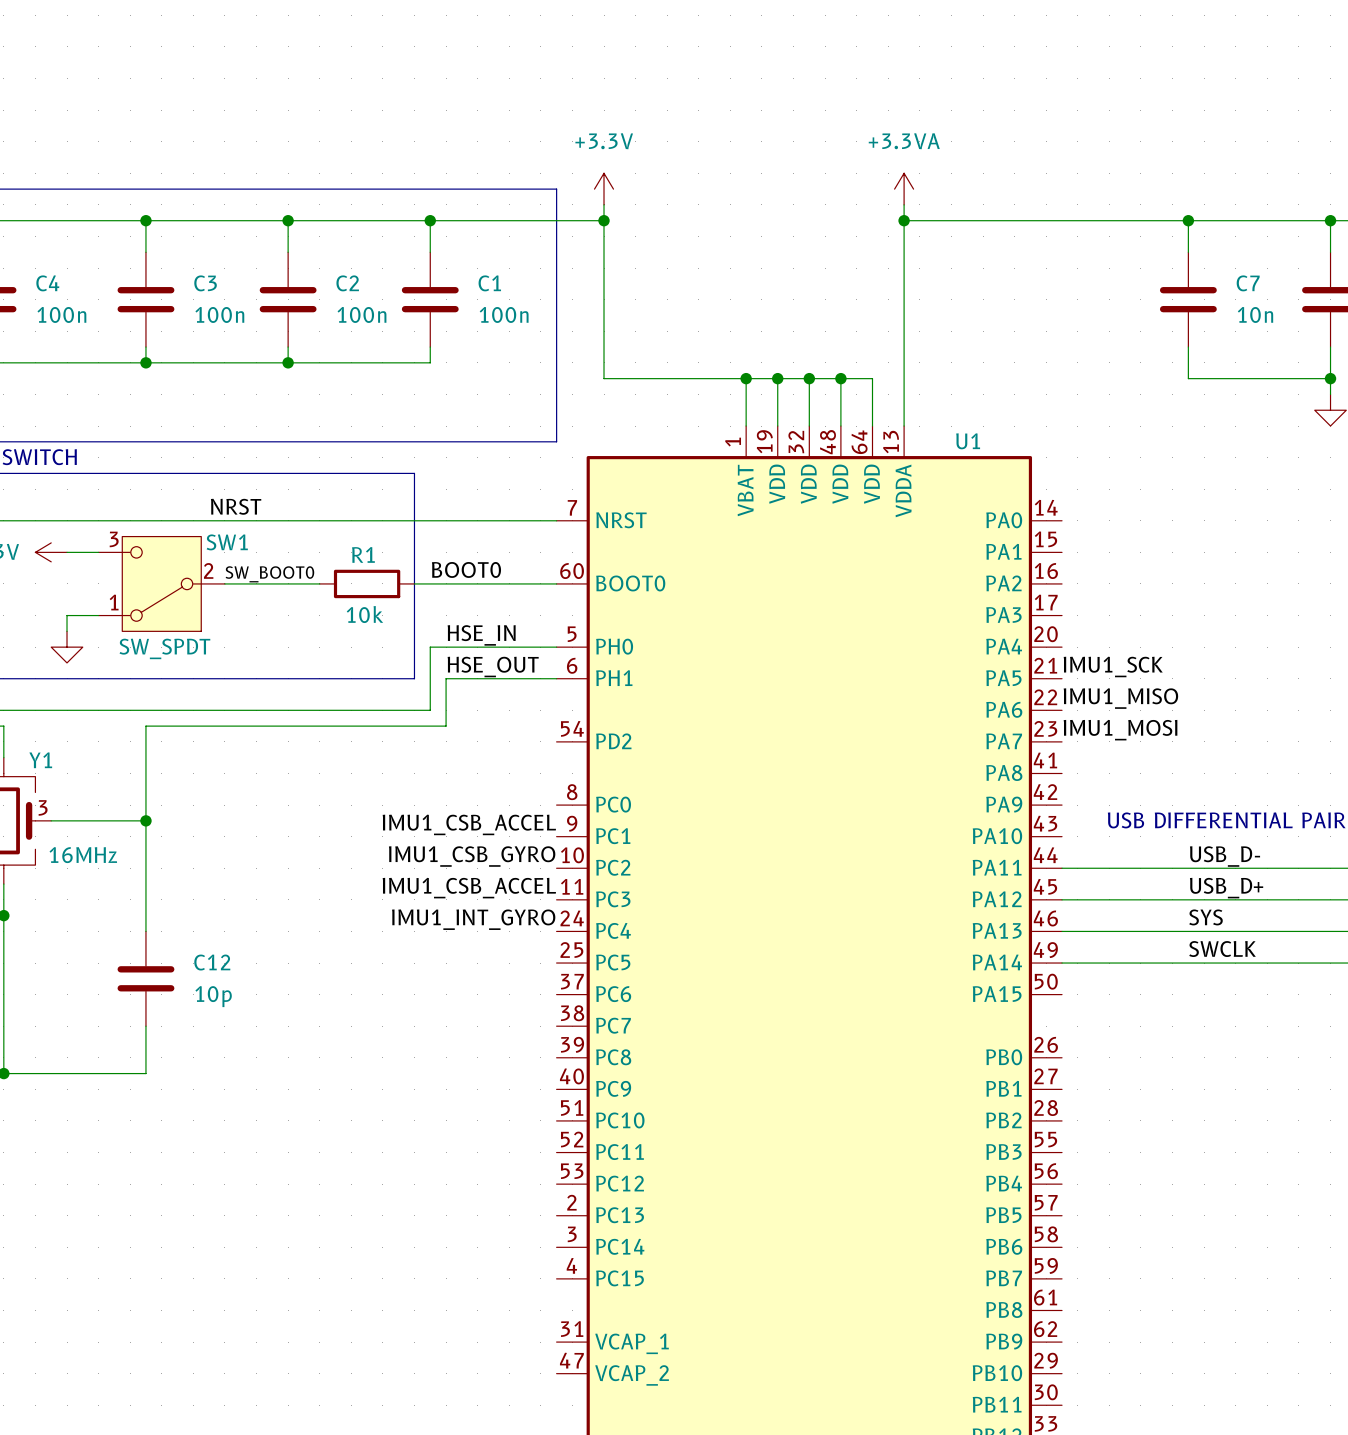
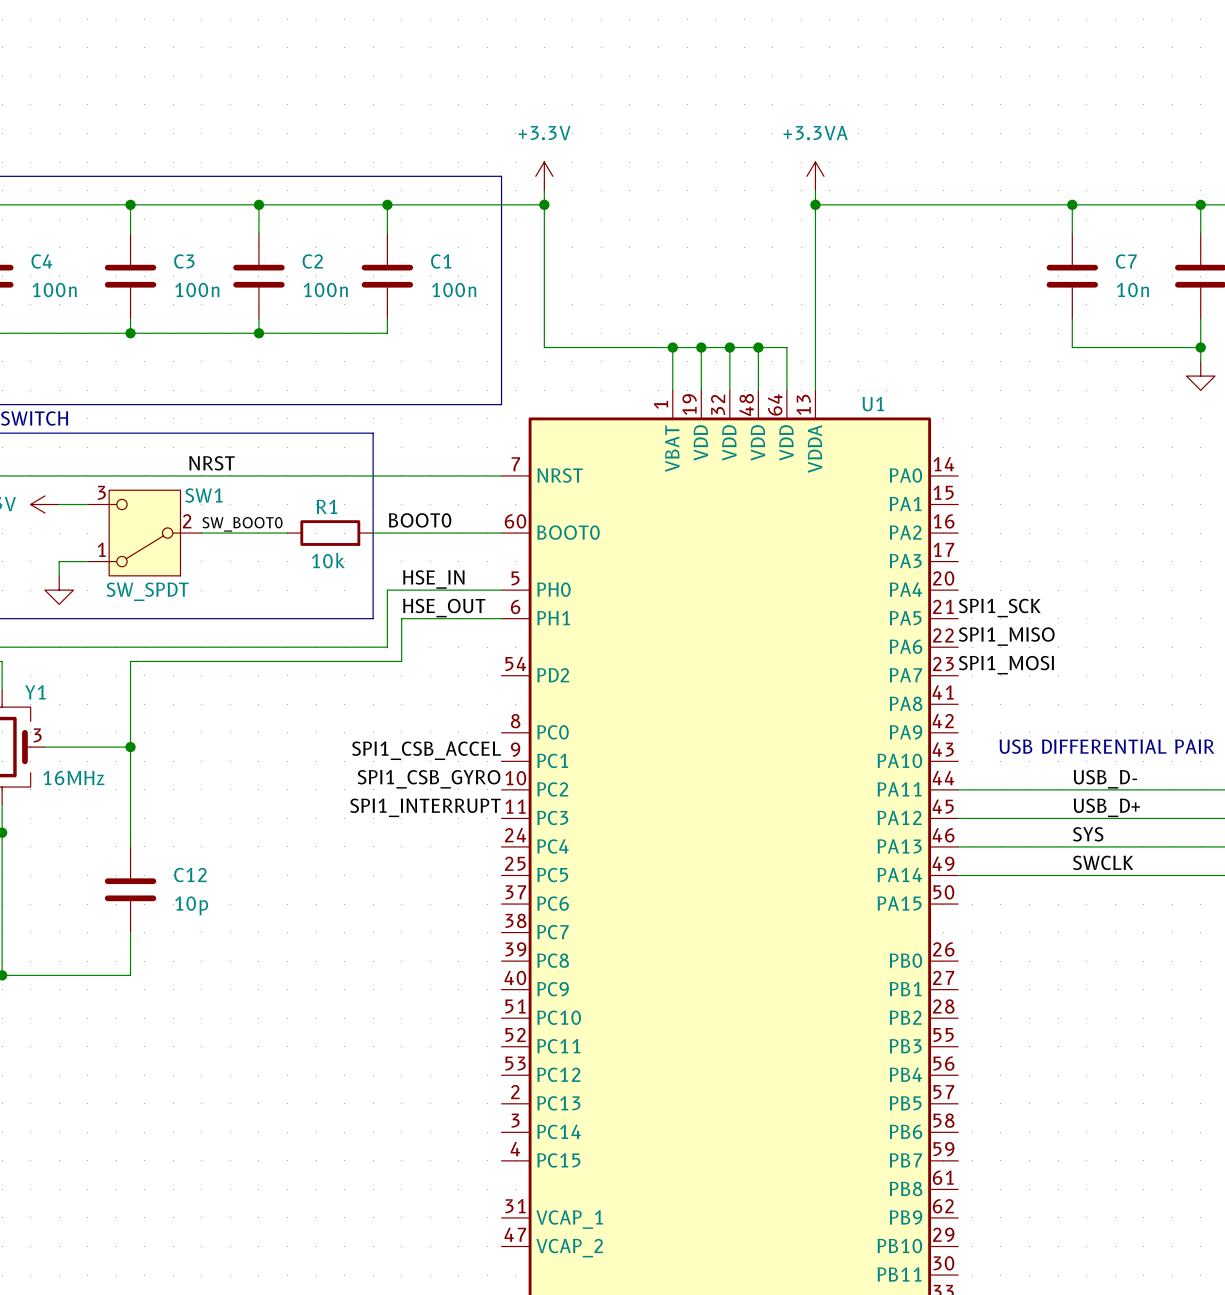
label: IMU1_SCK (1113, 666) -> SPI1_SCK (999, 608)
label: IMU1_MISO (1120, 698) -> SPI1_MISO (1006, 636)
label: IMU1_MOSI (1120, 730) -> SPI1_MOSI (1006, 665)
label: IMU1_CSB_ACCEL (469, 824) -> SPI1_CSB_ACCEL (426, 750)
label: IMU1_CSB_GYRO (472, 856) -> SPI1_CSB_GYRO (429, 779)
label: IMU1_CSB_ACCEL (469, 888) -> SPI1_INTERRUPT (425, 807)
label: IMU1_INT_GYRO (473, 919) -> none

